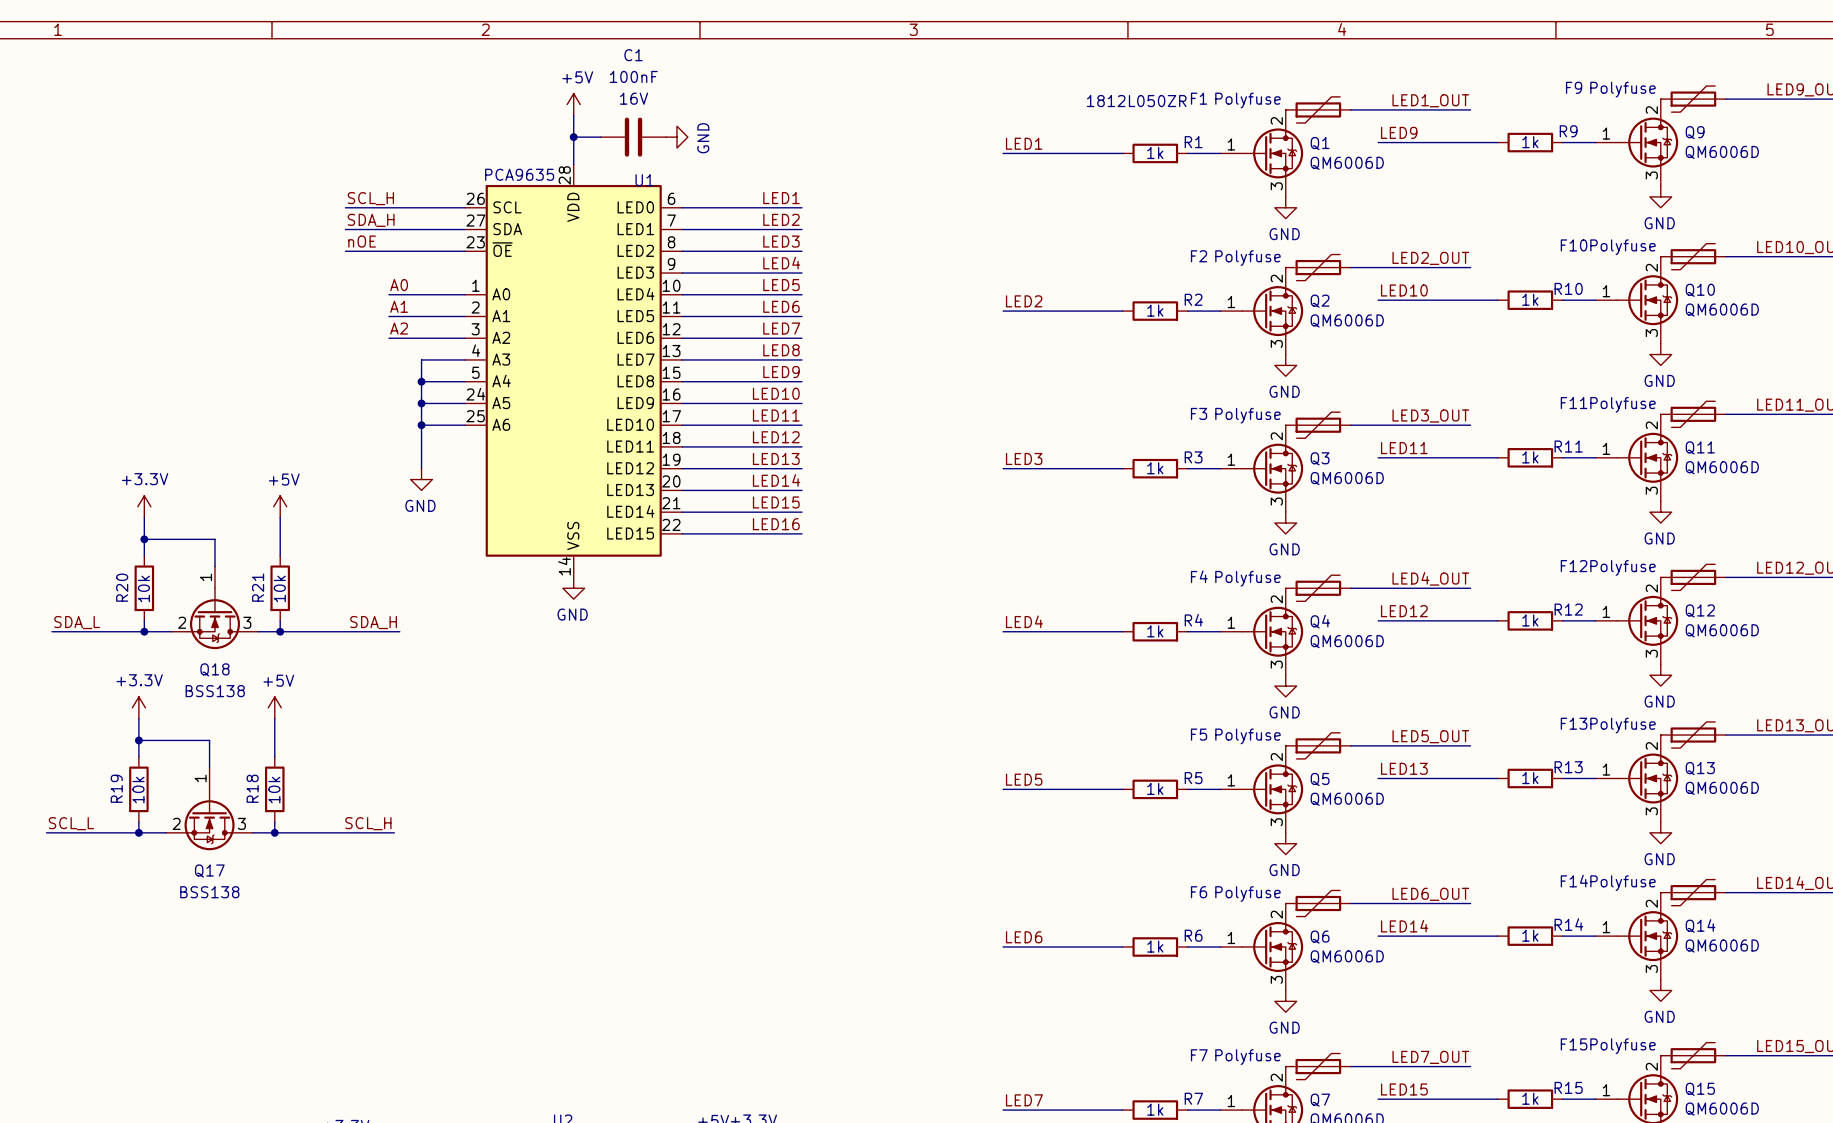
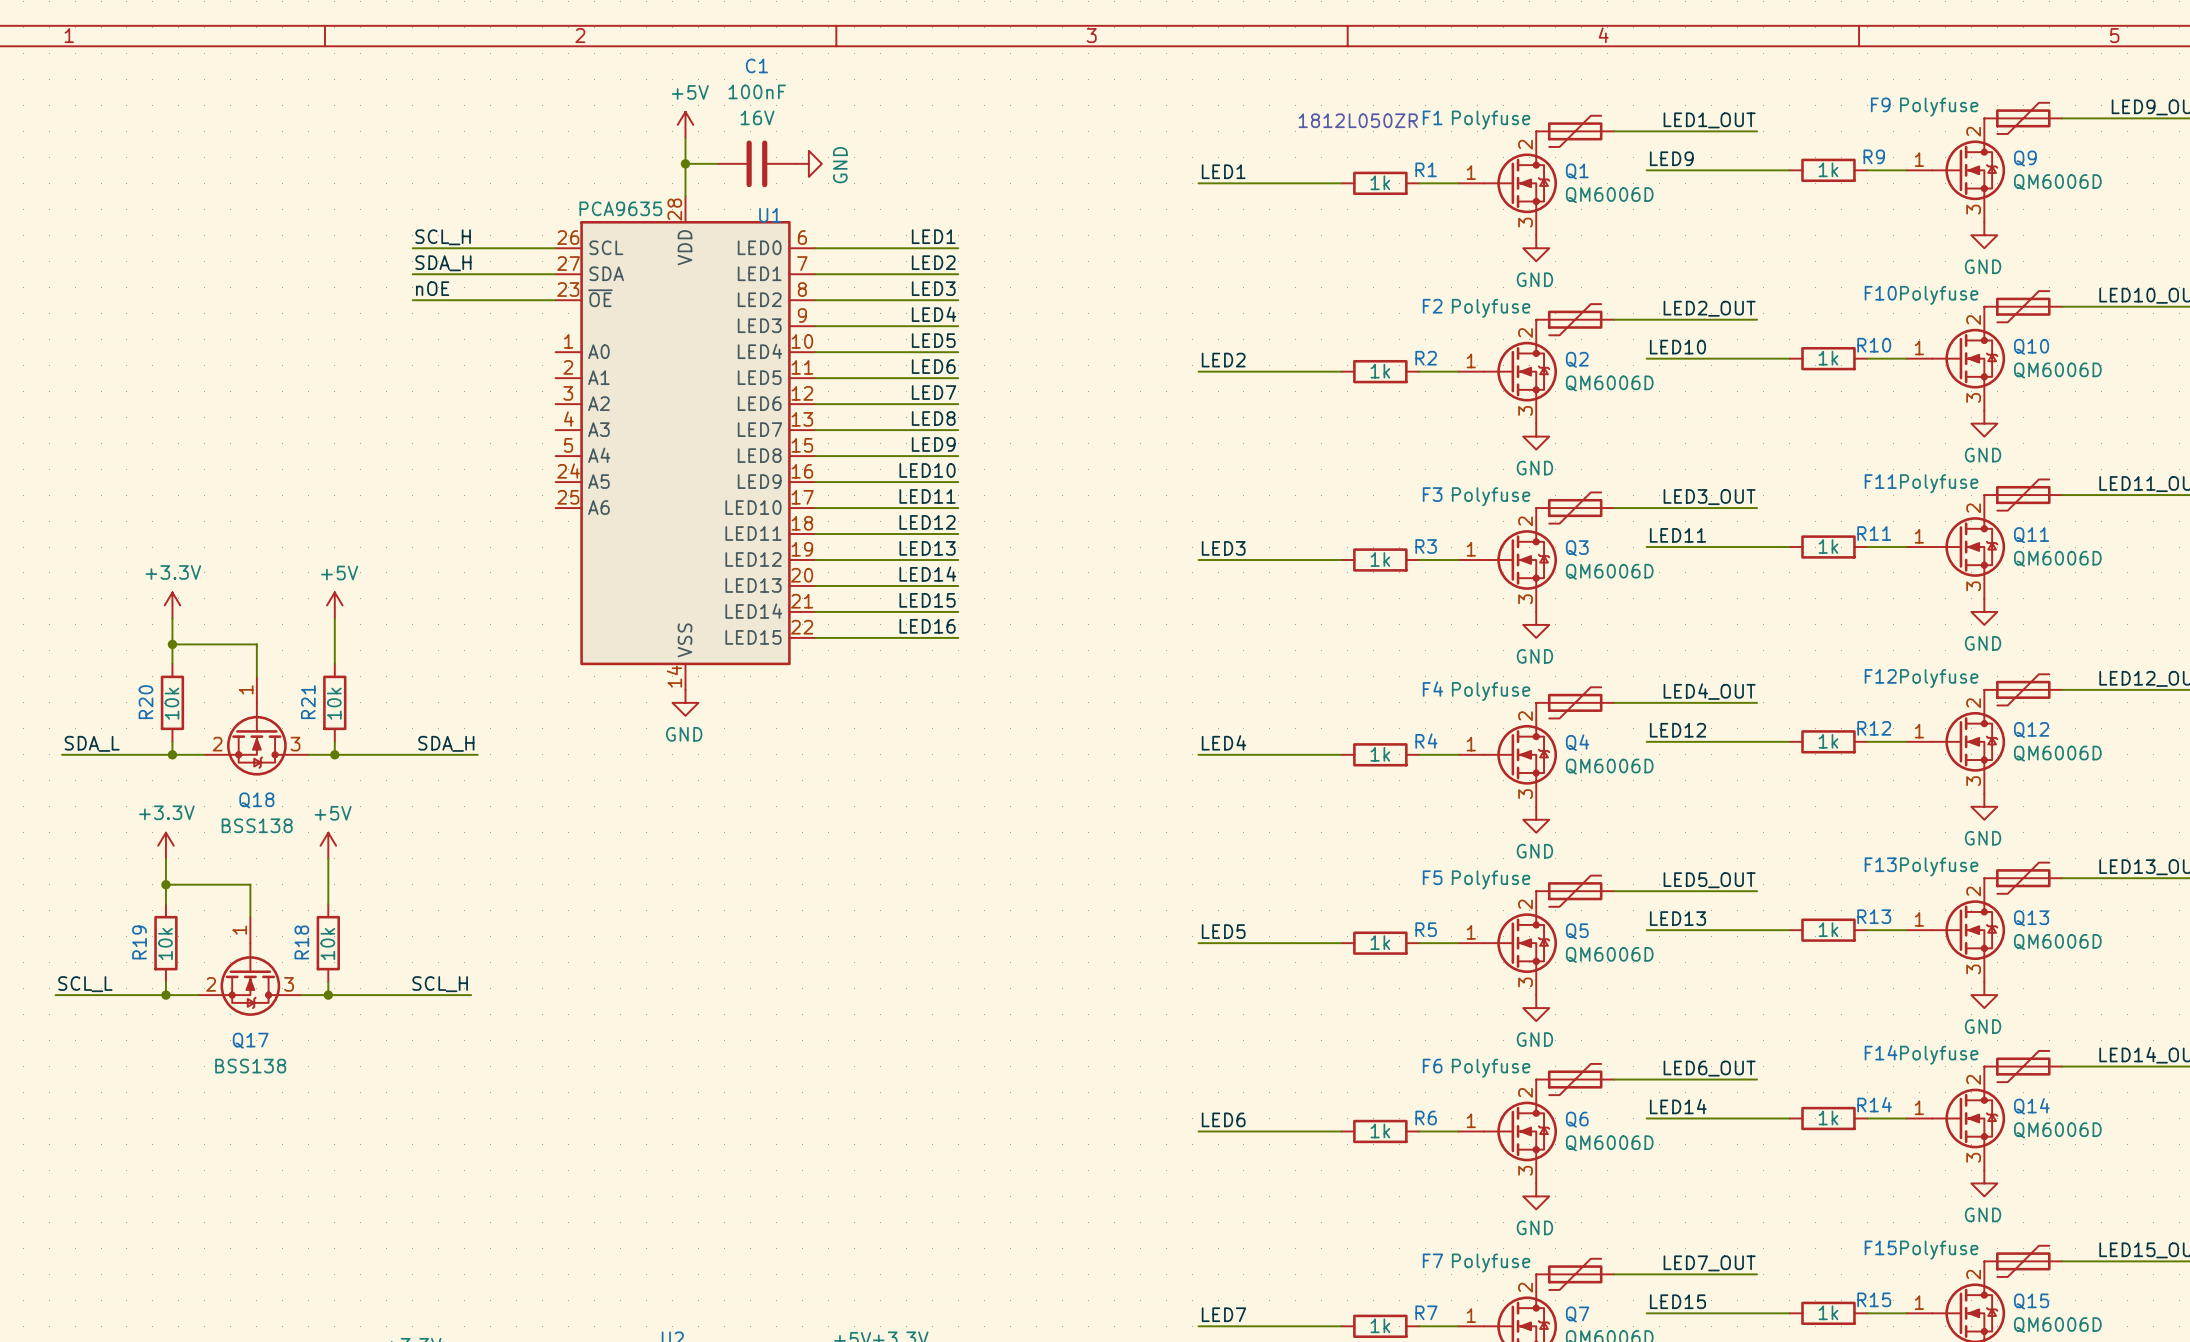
label: A0 (399, 285) -> none
wire: (388, 294) (465, 294) -> none
label: A1 (399, 306) -> none
wire: (388, 316) (465, 316) -> none
label: A2 (399, 328) -> none
wire: (388, 338) (465, 338) -> none
wire: (465, 359) (421, 359) (421, 468) -> none
wire: (421, 381) (465, 381) -> none
junction: (421, 381) -> none
wire: (421, 403) (465, 403) -> none
junction: (421, 403) -> none
wire: (421, 425) (465, 425) -> none
junction: (421, 425) -> none
power symbol: GND (421, 479) -> none

